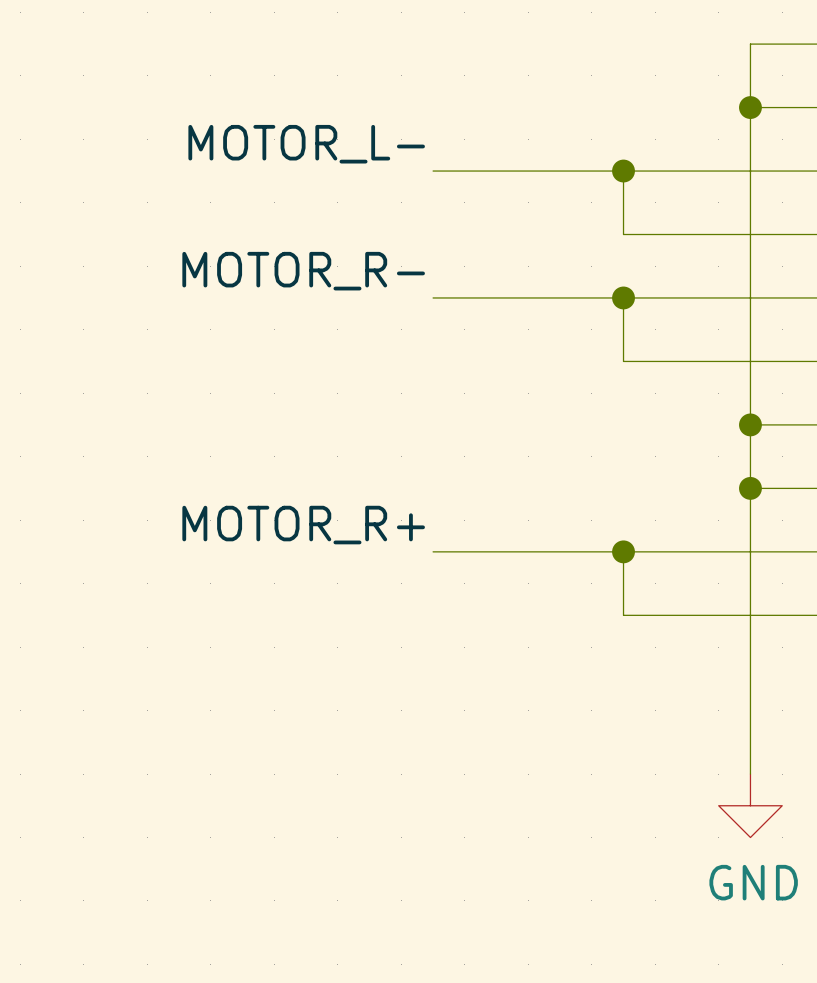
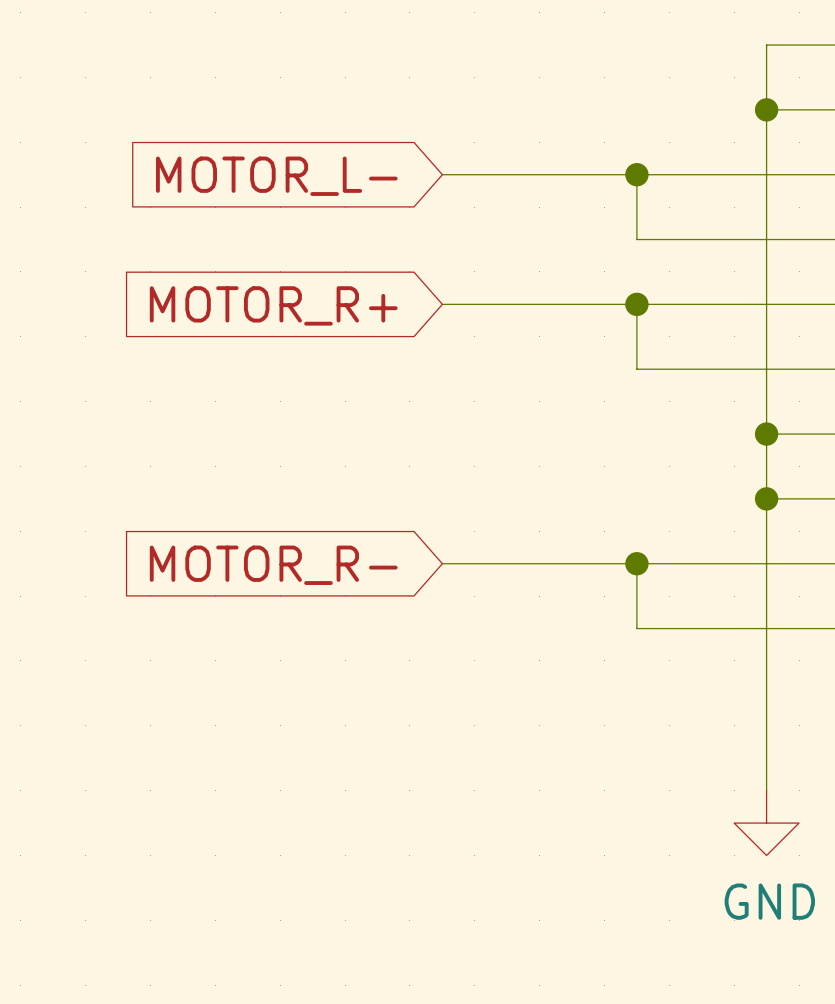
label: MOTOR_L- (306, 144) -> none
global label: none -> MOTOR_L- (276, 176)
label: MOTOR_R- (303, 271) -> none
global label: none -> MOTOR_R+ (273, 305)
label: MOTOR_R+ (303, 525) -> none
global label: none -> MOTOR_R- (273, 565)

